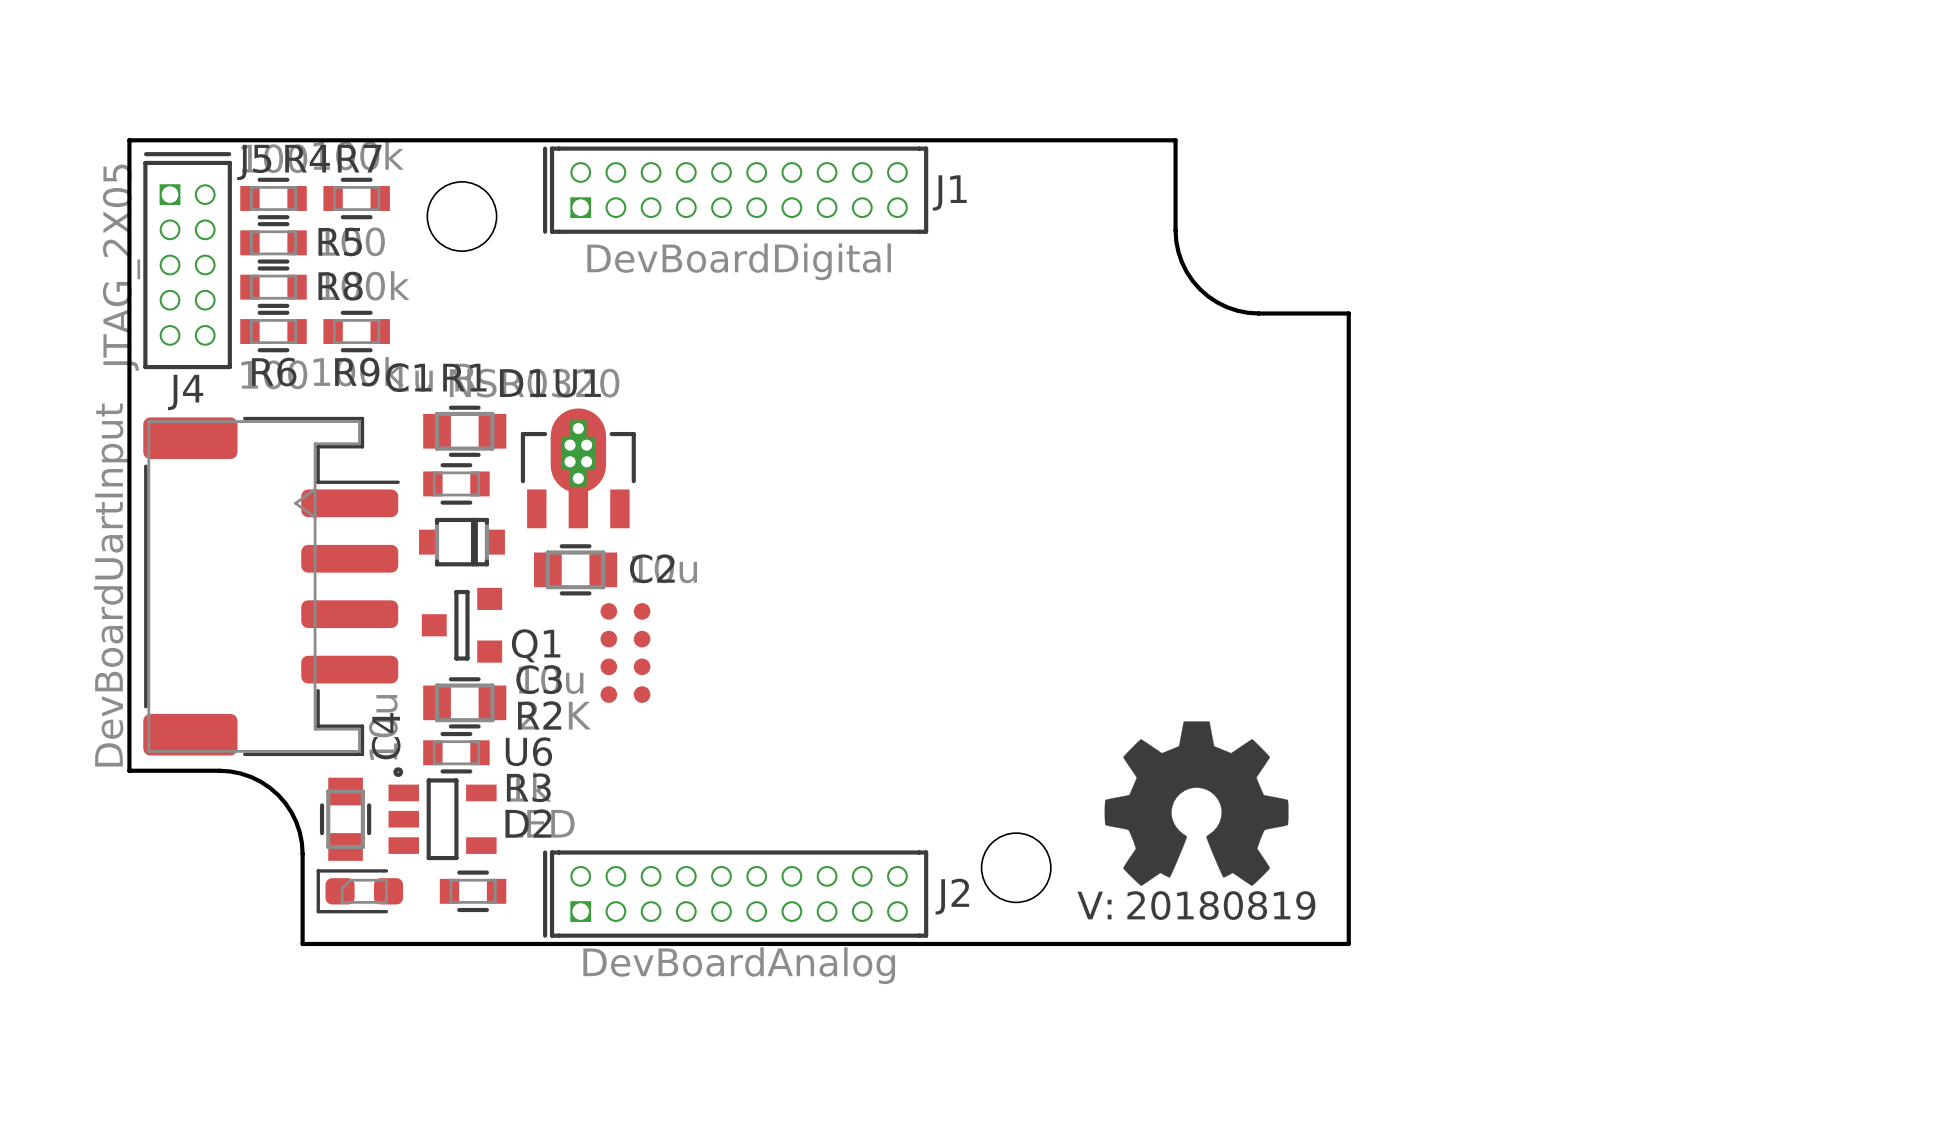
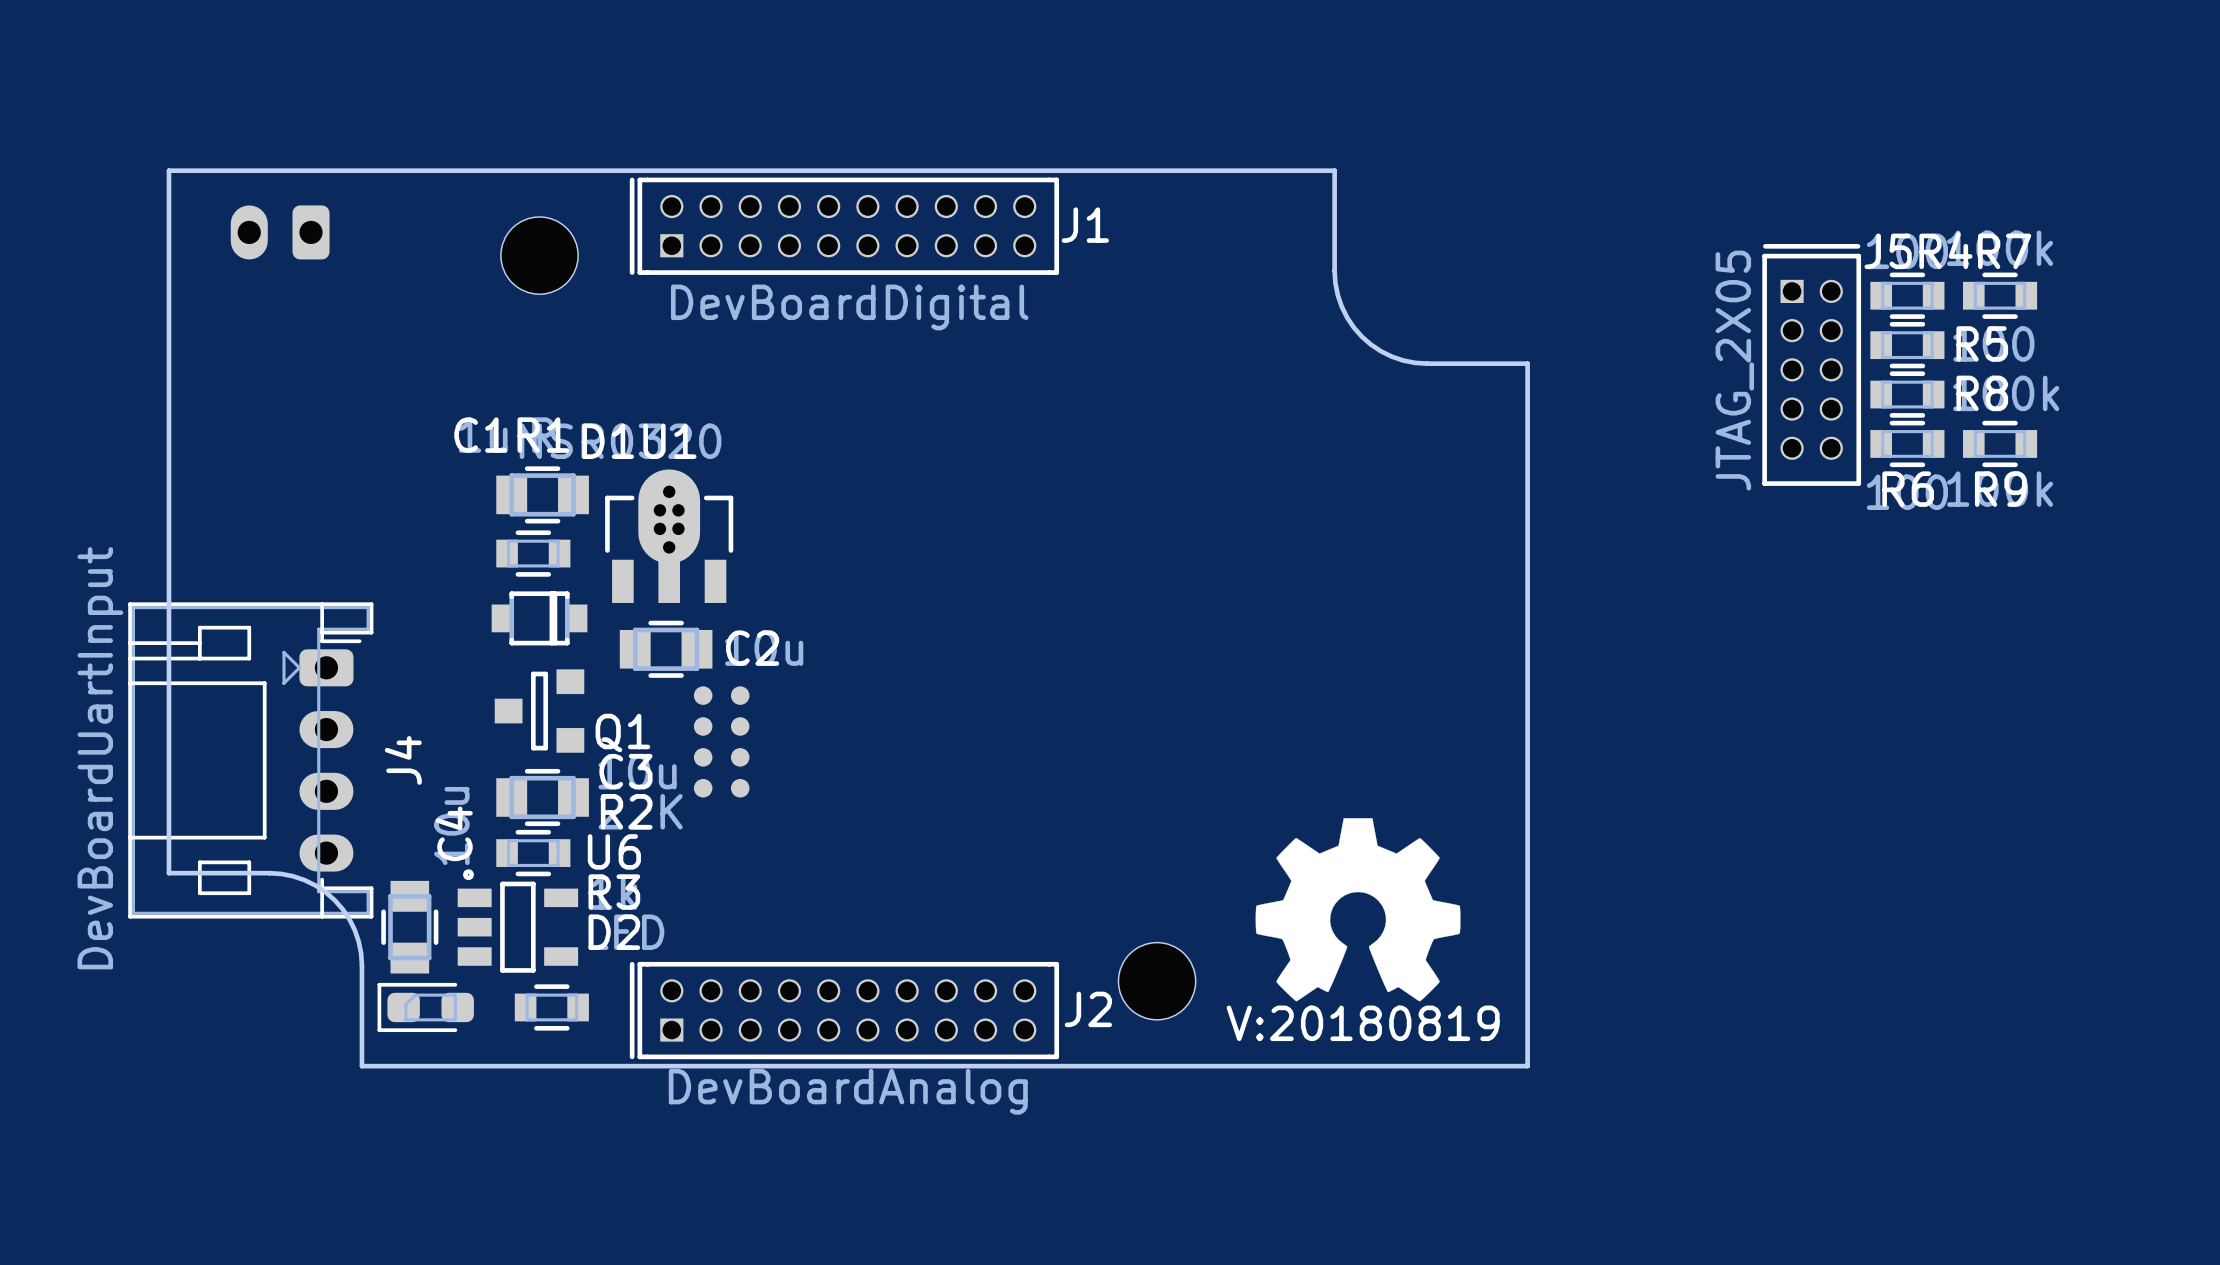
part: none -> (280, 232)
R4 position: (273, 198) -> (1907, 295)
R7 position: (356, 198) -> (2000, 295)
R5 position: (273, 242) -> (1907, 345)
J5 position: (187, 260) -> (1811, 364)
R8 position: (273, 287) -> (1907, 394)
R6 position: (273, 331) -> (1907, 443)
R9 position: (356, 331) -> (2000, 443)
J4 name position: J4 (185, 392) -> J4 (403, 760)
J4 footprint: [143, 416, 400, 757] -> [128, 602, 374, 919]

